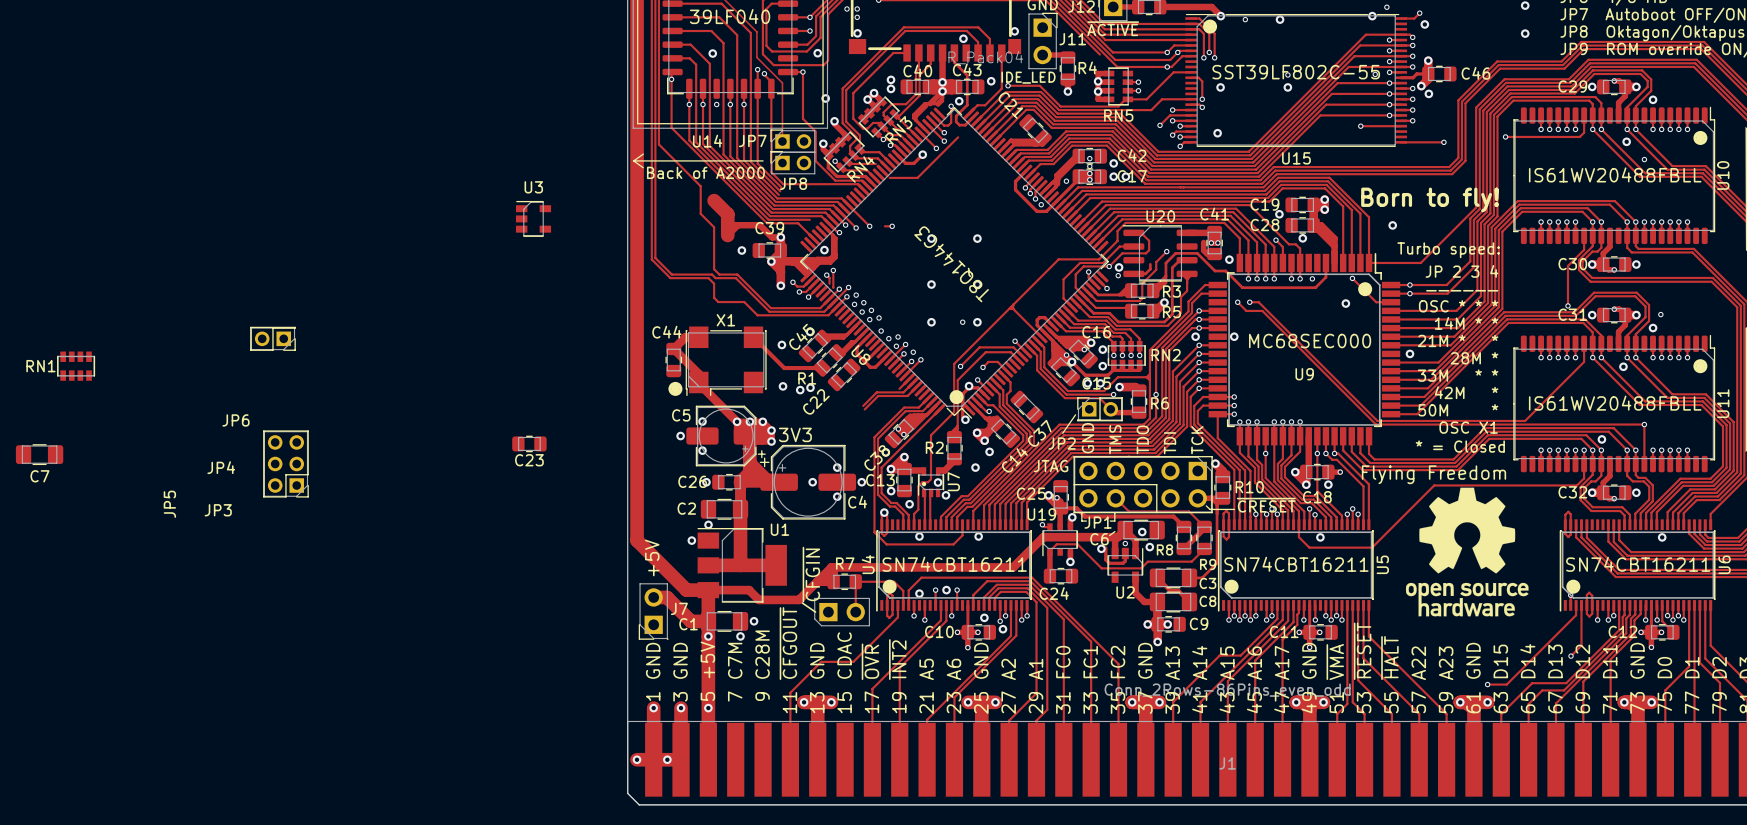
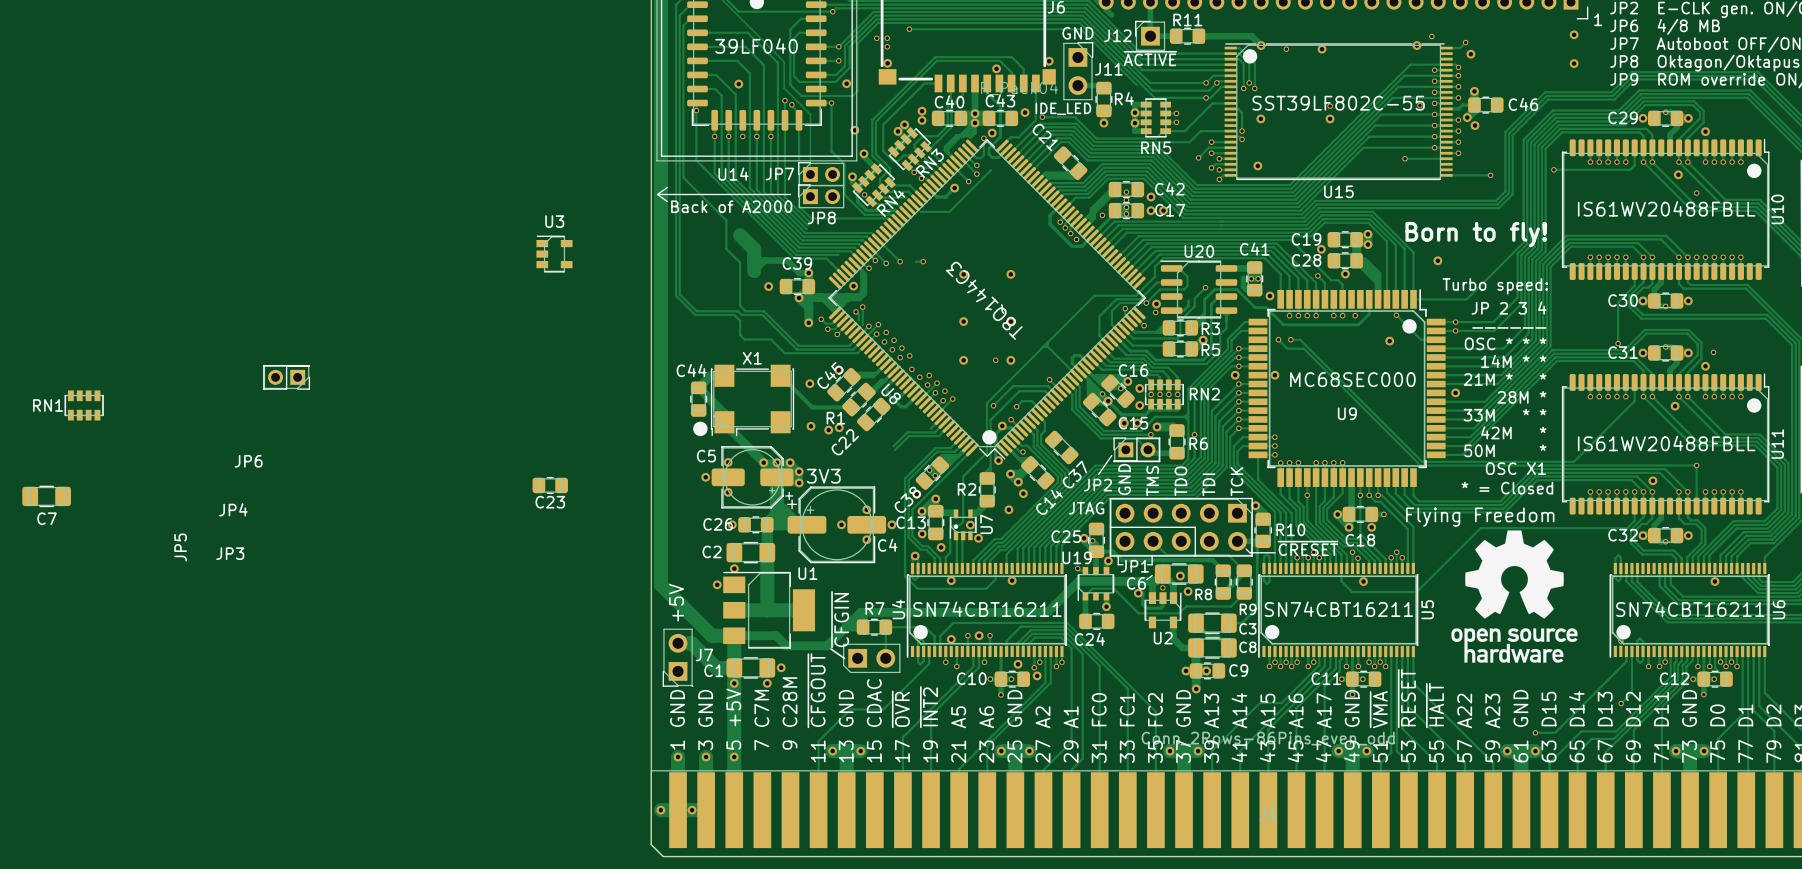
part: (285, 463) -> none

